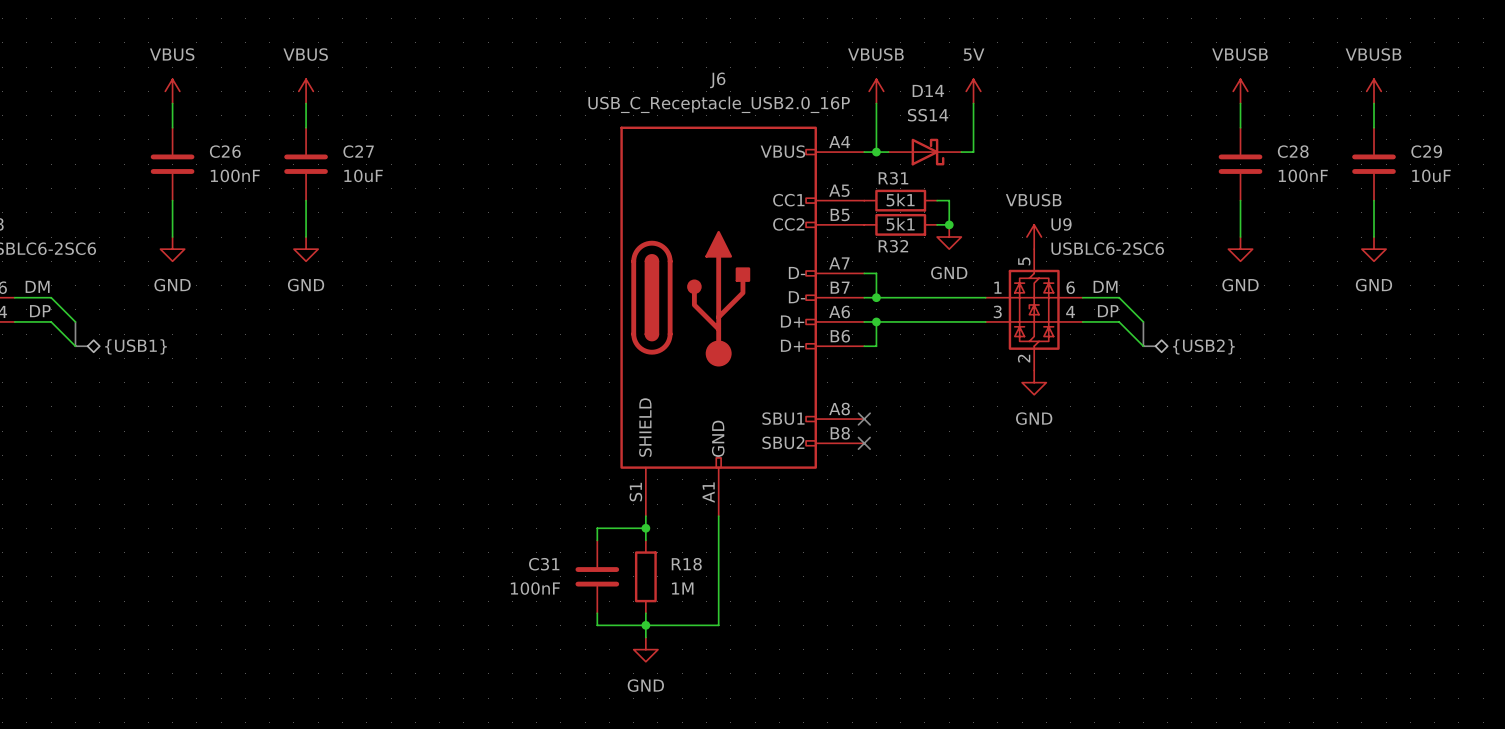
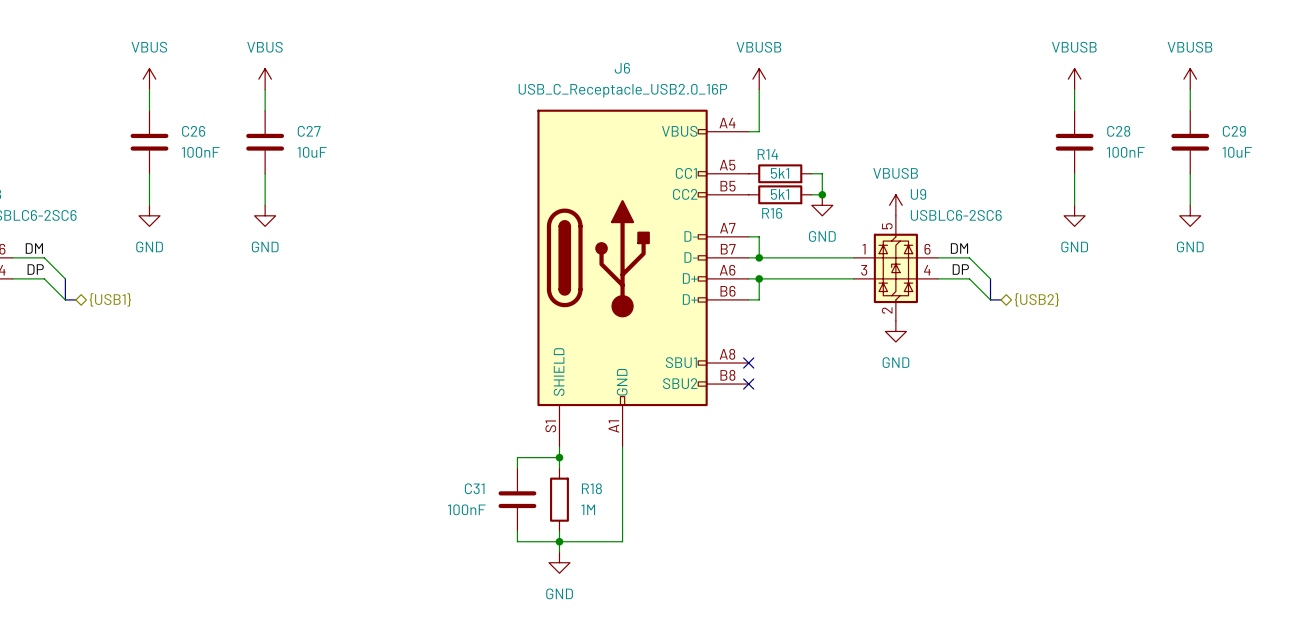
power symbol: 5V (973, 91) -> none
wire: (973, 103) (973, 152) (961, 152) -> none
wire: (876, 152) (888, 152) -> none
junction: (876, 152) -> none
D14: SS14 (924, 152) -> none
R31 name: R31 (893, 178) -> R14 (767, 154)
R32 name: R32 (893, 246) -> R16 (772, 213)

